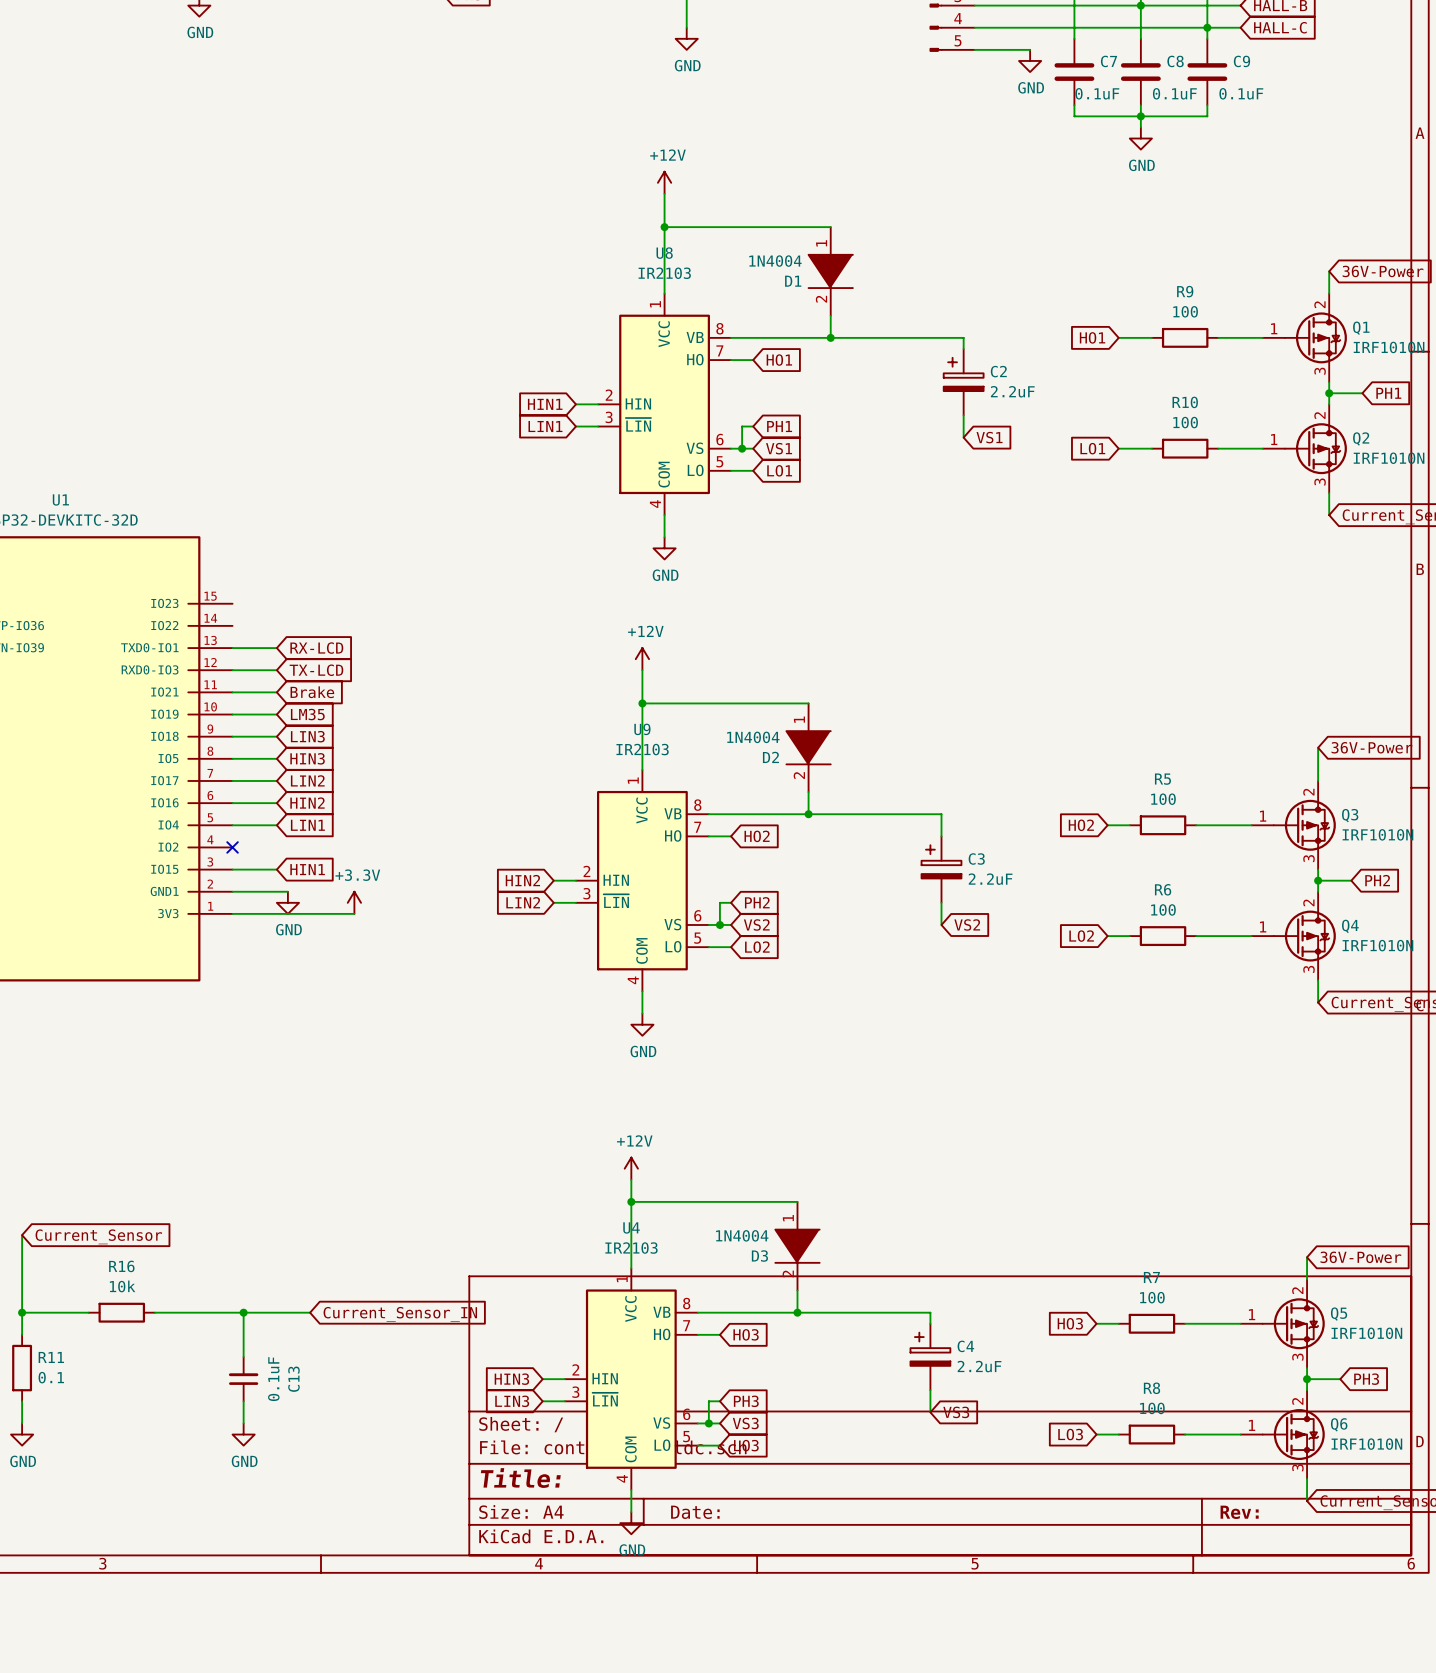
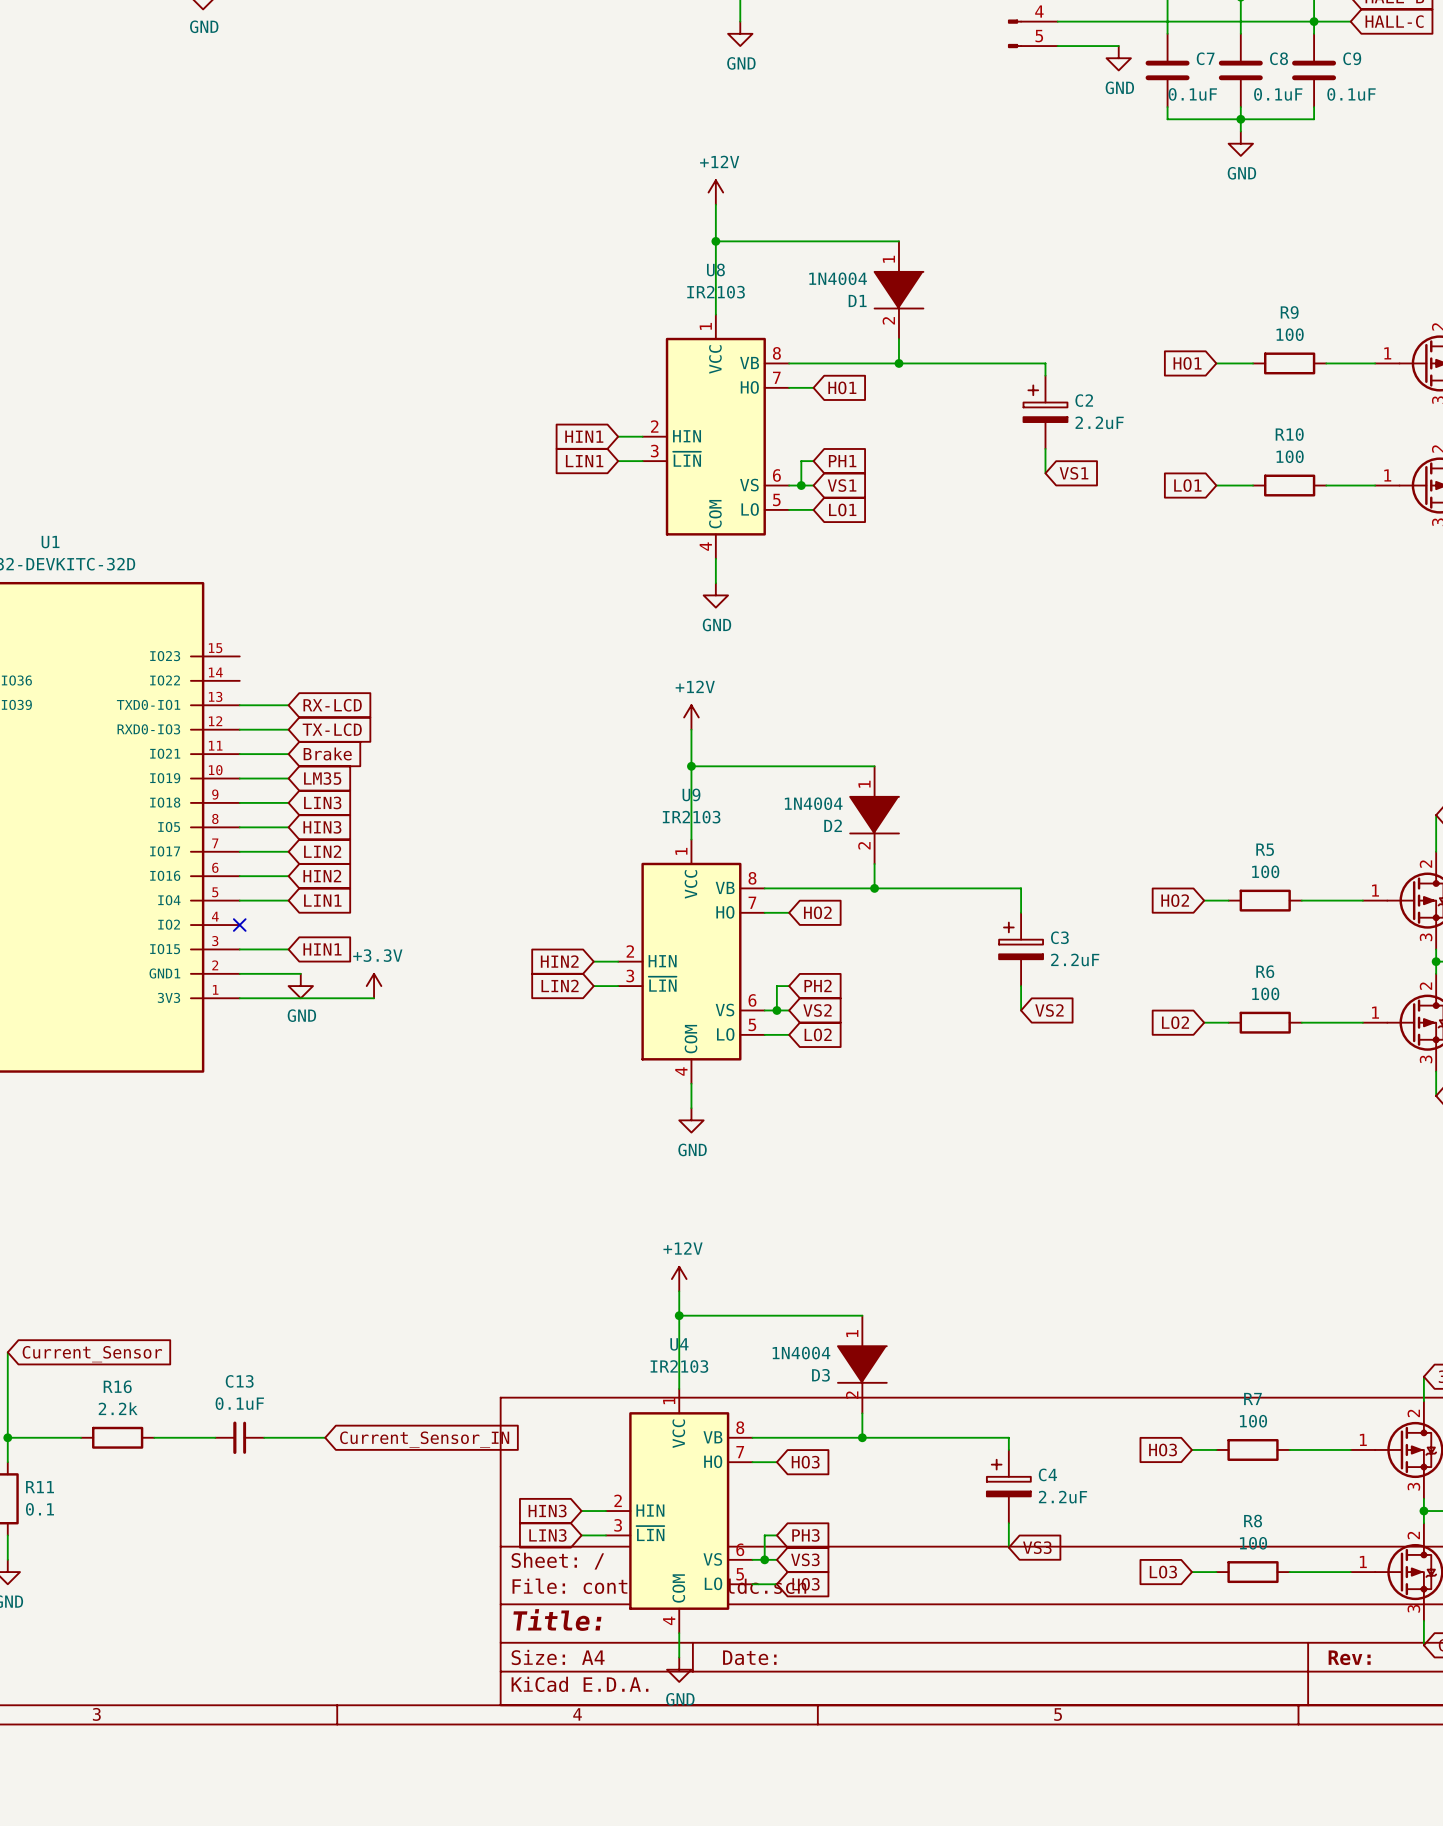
R16 value: 10k (122, 1286) -> 2.2k (118, 1408)
wire: (243, 1312) (243, 1357) -> none
junction: (243, 1312) -> none
C13 rotation: 0° (243, 1379) -> 90° counterclockwise (239, 1437)
C13 position: (243, 1379) -> (239, 1437)
wire: (243, 1401) (243, 1423) -> none
power symbol: GND (243, 1434) -> none

